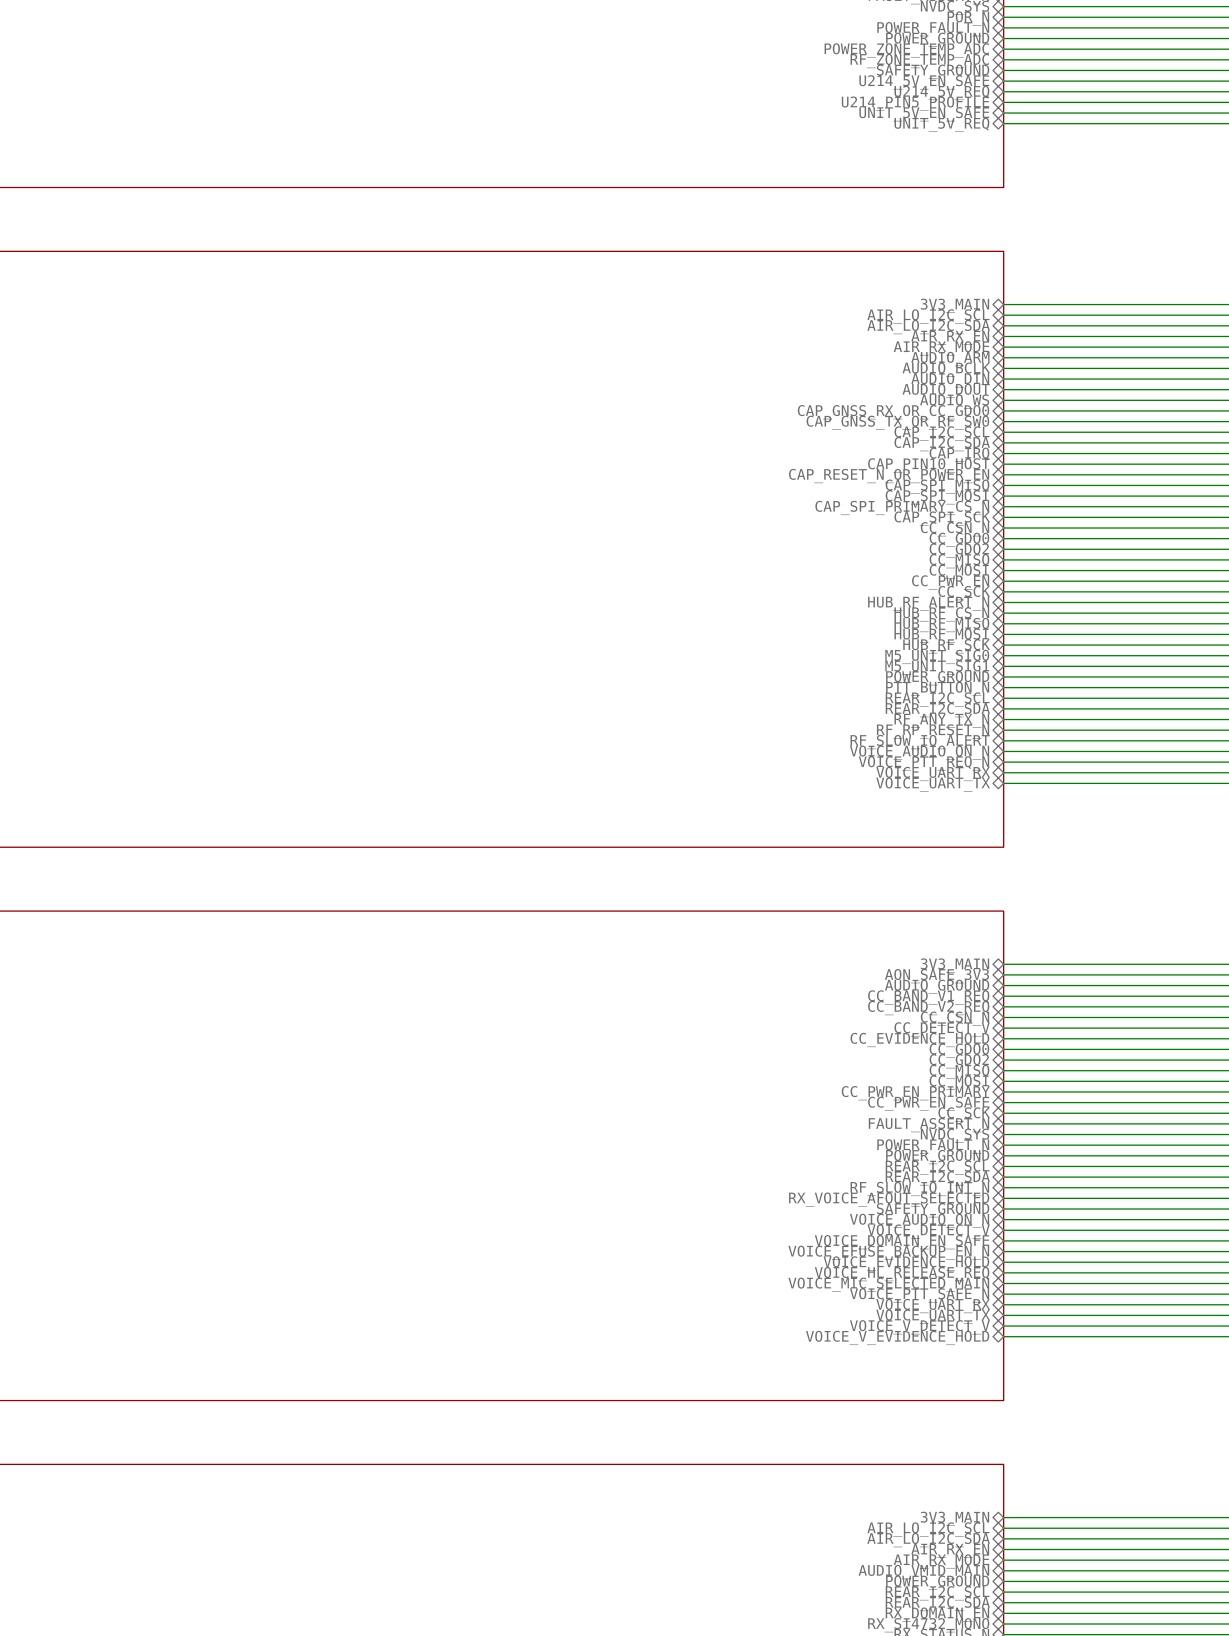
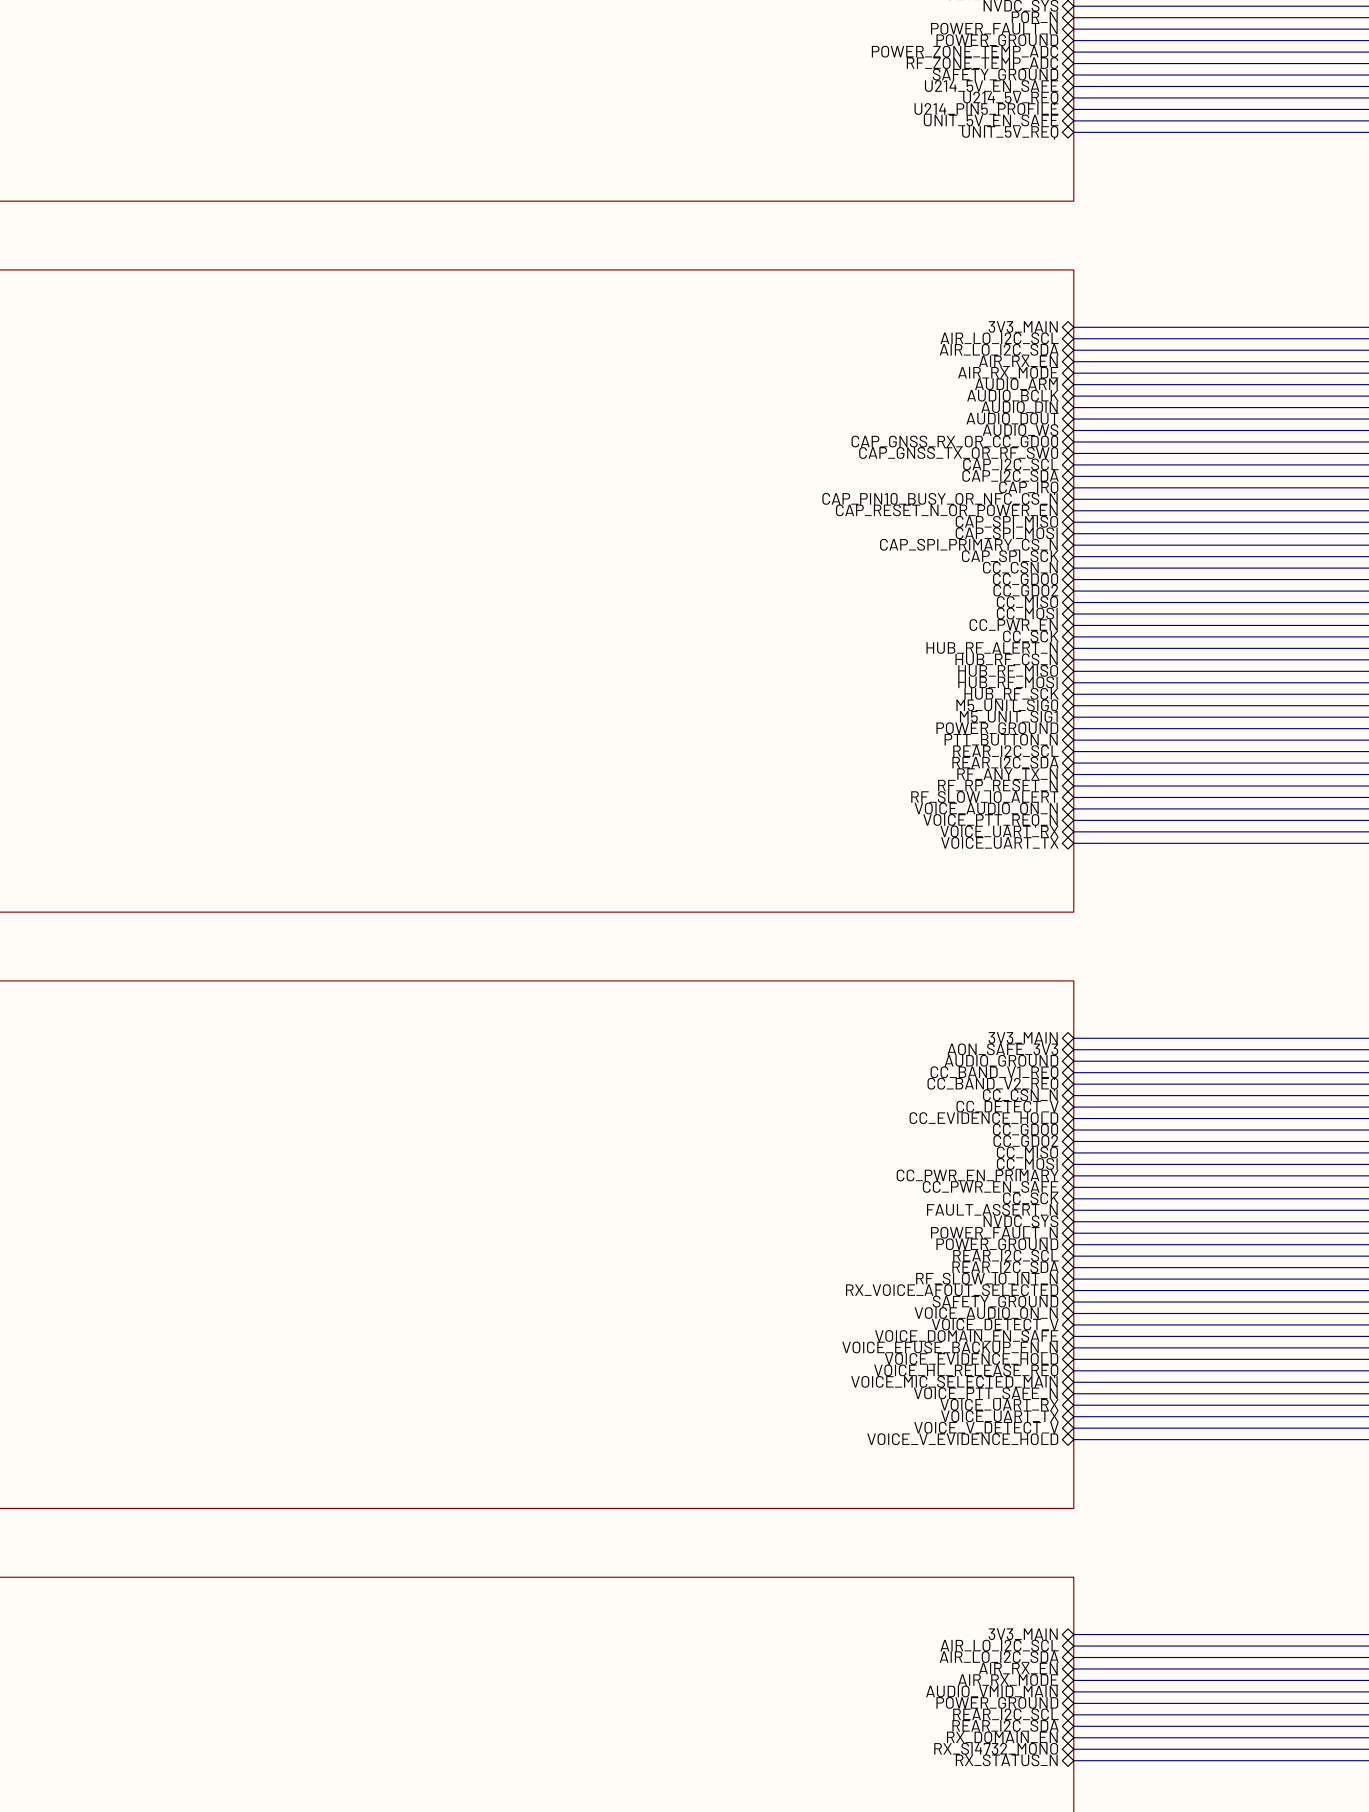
sheet pin: CAP_PIN10_HOST (928, 465) -> CAP_PIN10_BUSY_OR_NFC_CS_N (940, 498)

